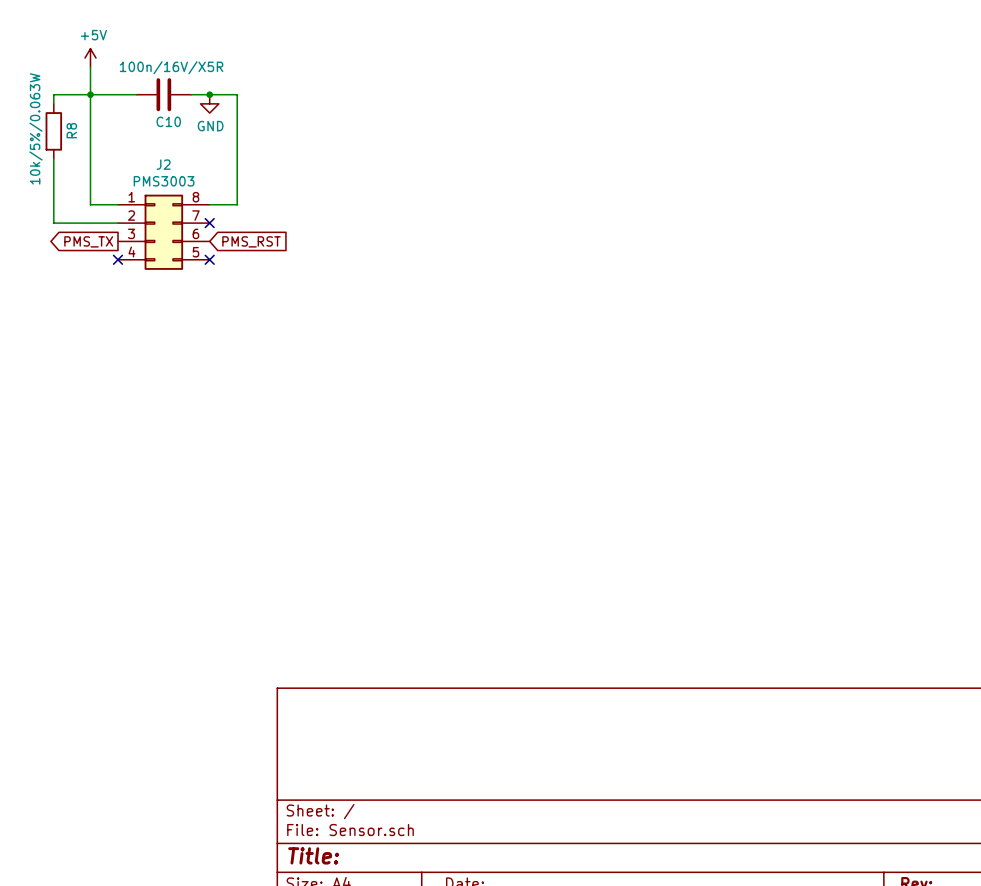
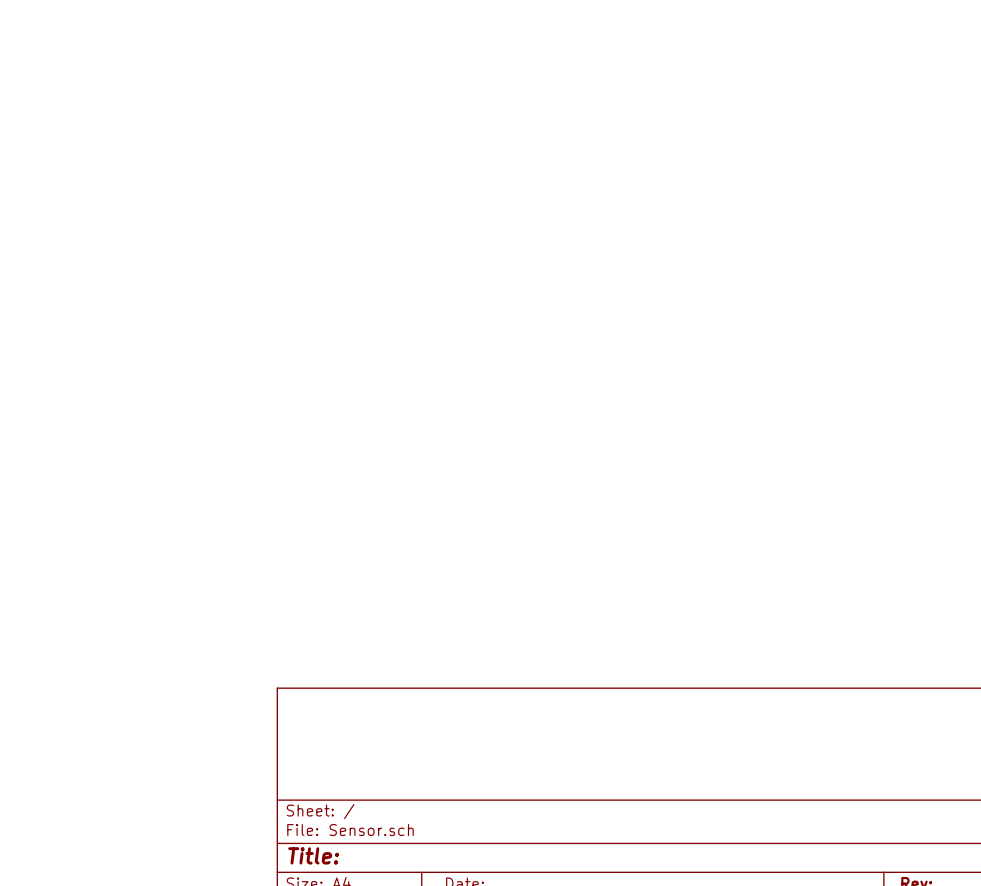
power symbol: +5V (90, 58) -> none
wire: (90, 67) (90, 204) (118, 204) -> none
junction: (90, 94) -> none
wire: (136, 94) (53, 94) (53, 103) -> none
C10: 100n/16V/X5R (163, 94) -> none
wire: (191, 94) (237, 94) (237, 204) (209, 204) -> none
junction: (209, 94) -> none
power symbol: GND (209, 103) -> none
R8: 10k/5%/0.063W (53, 131) -> none
wire: (53, 158) (53, 223) (118, 223) -> none
no-connect mark: (209, 223) -> none
J2: PMS3003 (163, 232) -> none
global label: PMS_TX (88, 241) -> none
global label: PMS_RST (251, 241) -> none
no-connect mark: (118, 259) -> none
no-connect mark: (209, 259) -> none

